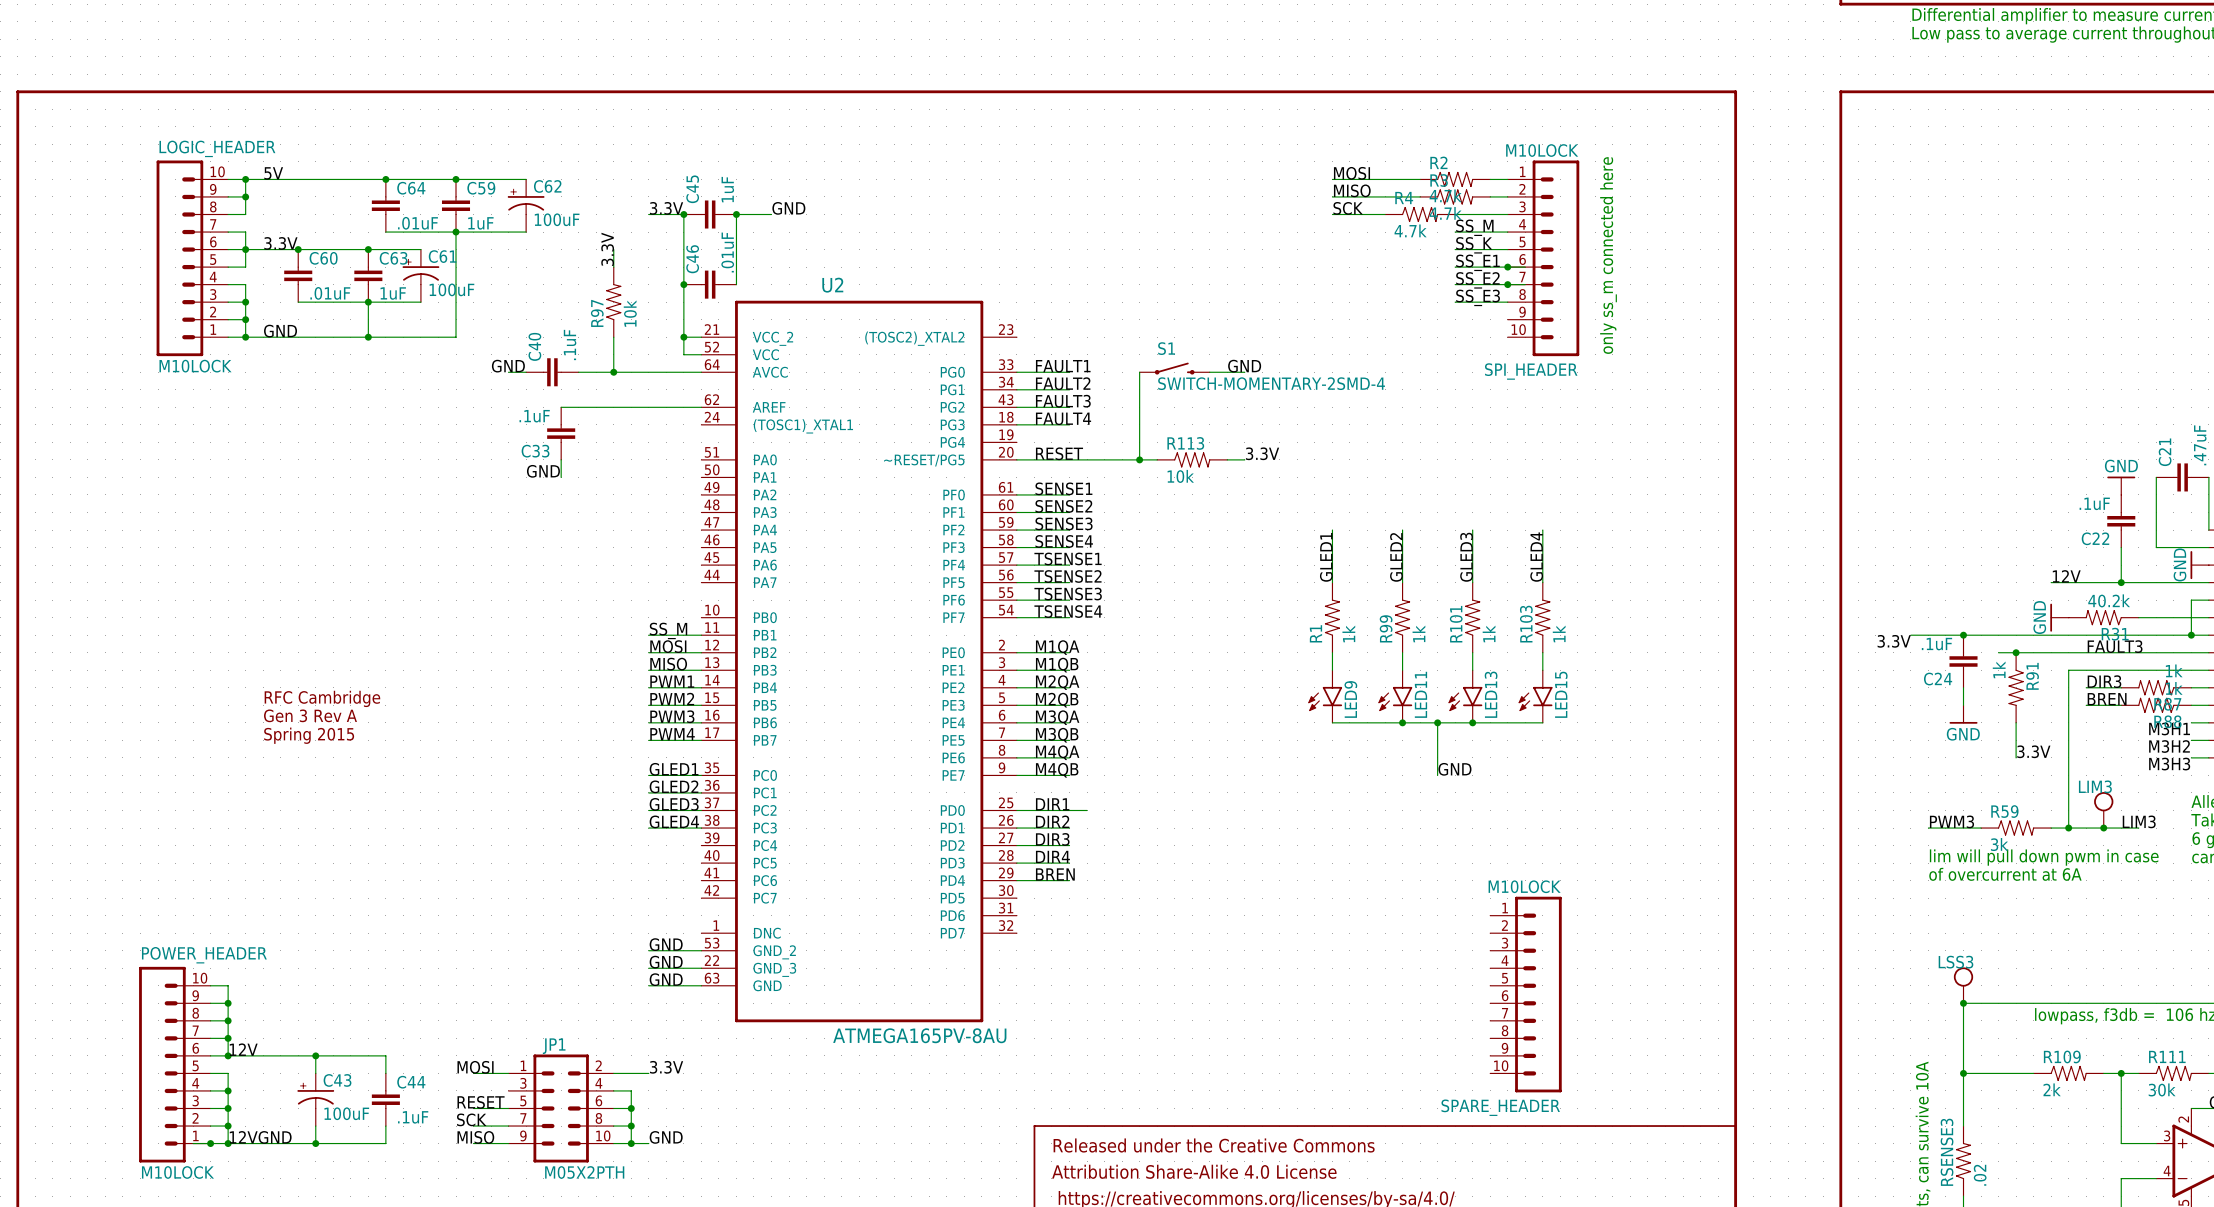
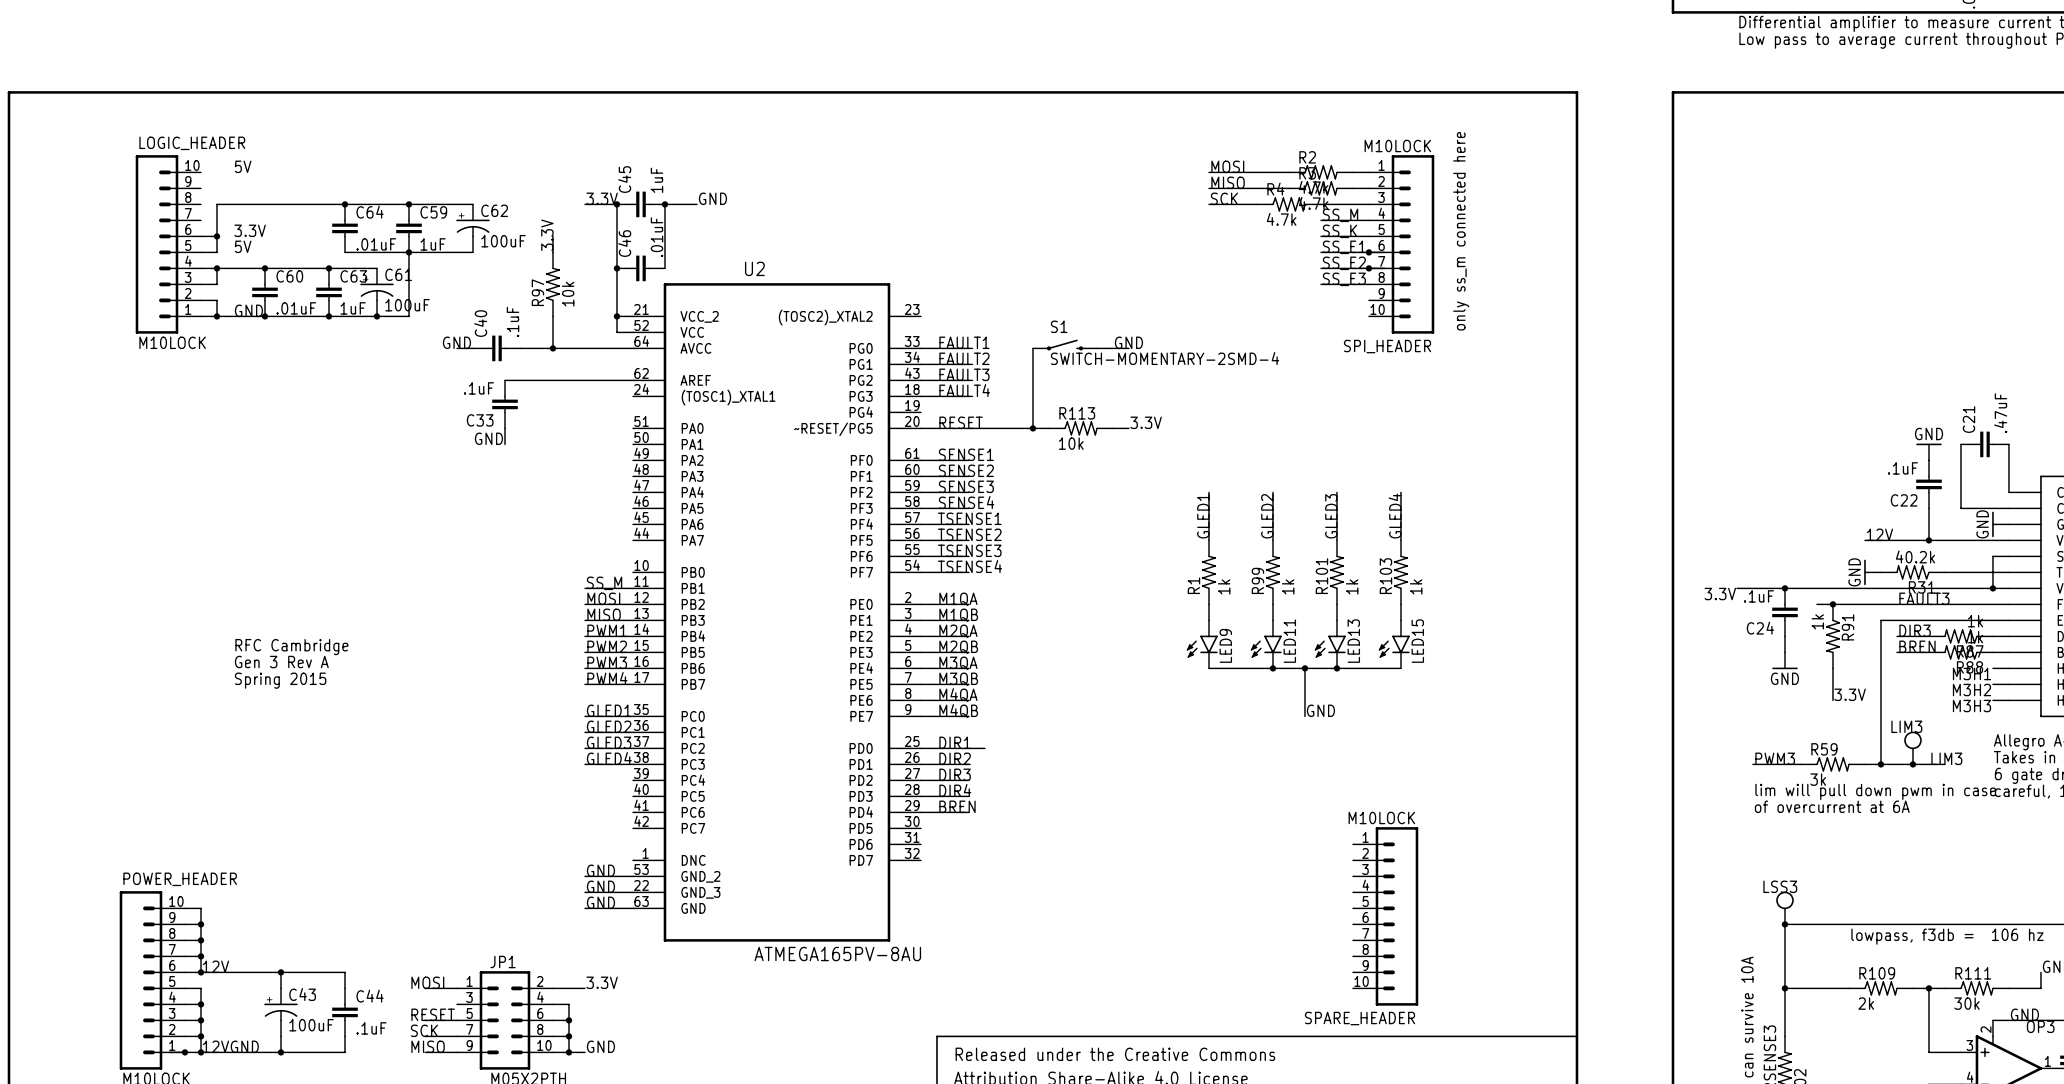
wire: (228, 179) (526, 179) -> none
wire: (245, 179) (245, 214) (228, 214) -> none
junction: (245, 179) -> none
junction: (385, 179) -> none
junction: (456, 179) -> none
wire: (228, 196) (245, 196) -> none
junction: (245, 196) -> none
C64 position: (385, 205) -> (344, 228)
C59 position: (456, 205) -> (408, 228)
C62 position: (526, 205) -> (472, 228)
junction: none -> (344, 204)
junction: none -> (408, 204)
wire: (228, 232) (245, 232) -> (472, 204) (217, 204) (217, 220)
wire: (385, 232) (526, 232) -> (344, 252) (472, 252)
junction: (456, 232) -> none
wire: (245, 249) (420, 249) -> (217, 268) (376, 268)
junction: (298, 249) -> none
junction: (368, 249) -> none
label: none -> 5V (243, 246)
junction: none -> (408, 252)
C60 position: (298, 275) -> (265, 292)
C63 position: (368, 275) -> (328, 292)
C61 position: (420, 275) -> (376, 292)
junction: none -> (217, 268)
junction: none -> (265, 268)
junction: none -> (328, 268)
wire: (245, 302) (245, 319) -> none
junction: (245, 302) -> none
wire: (298, 302) (420, 302) -> none
junction: (368, 302) -> none
junction: (245, 319) -> none
junction: none -> (265, 316)
junction: none -> (376, 316)

